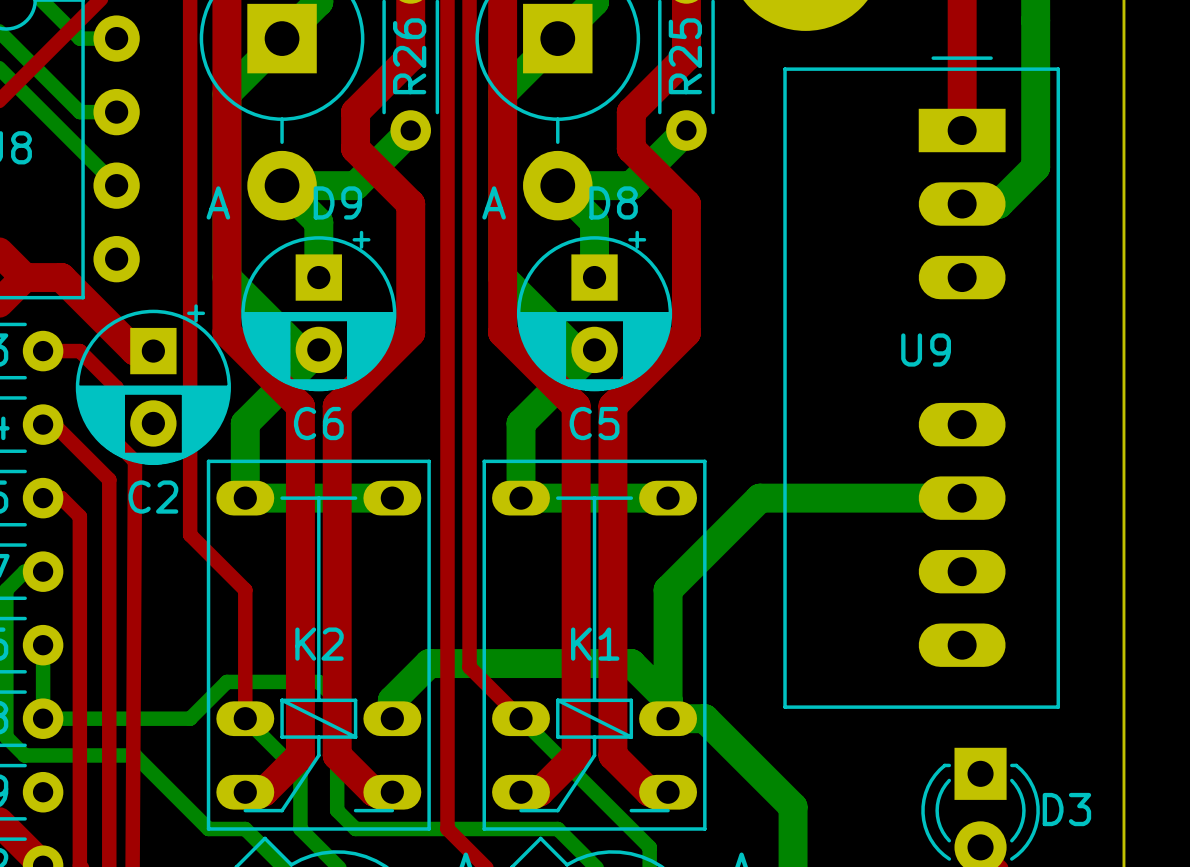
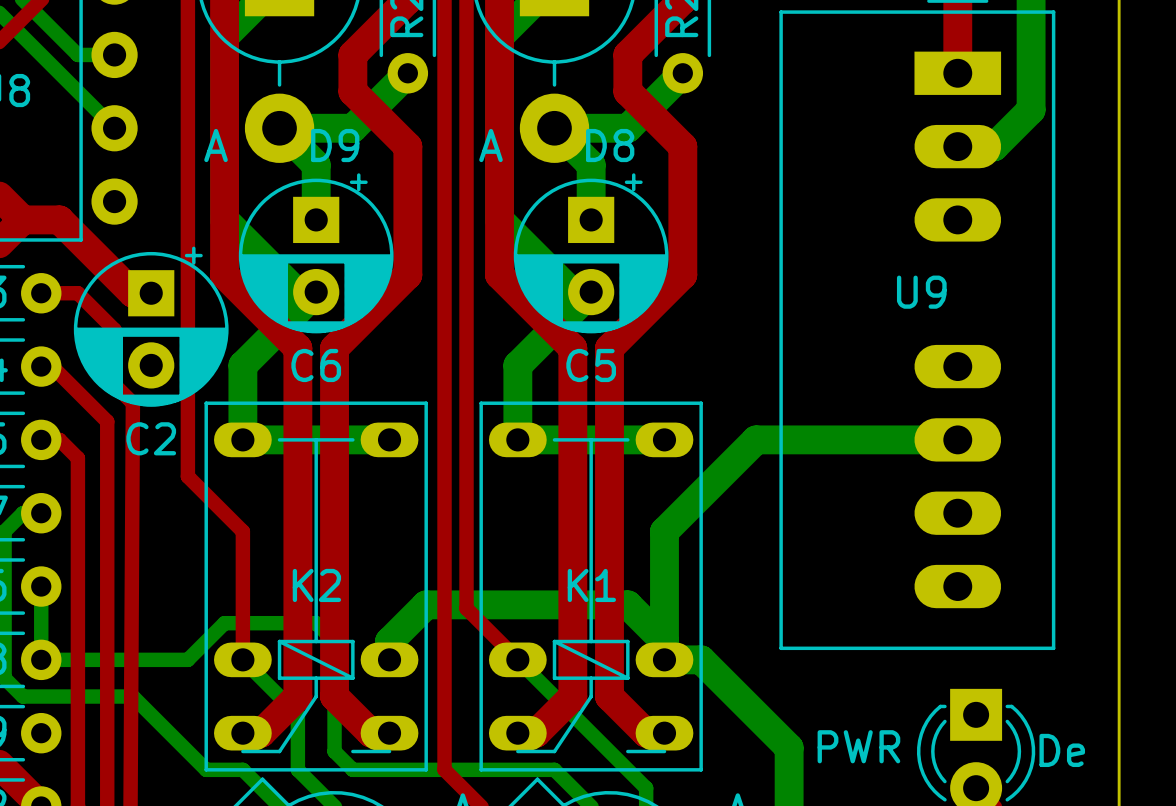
D3 value: none -> PWR (858, 746)
D3 name: D3 (1066, 809) -> De (1062, 750)

